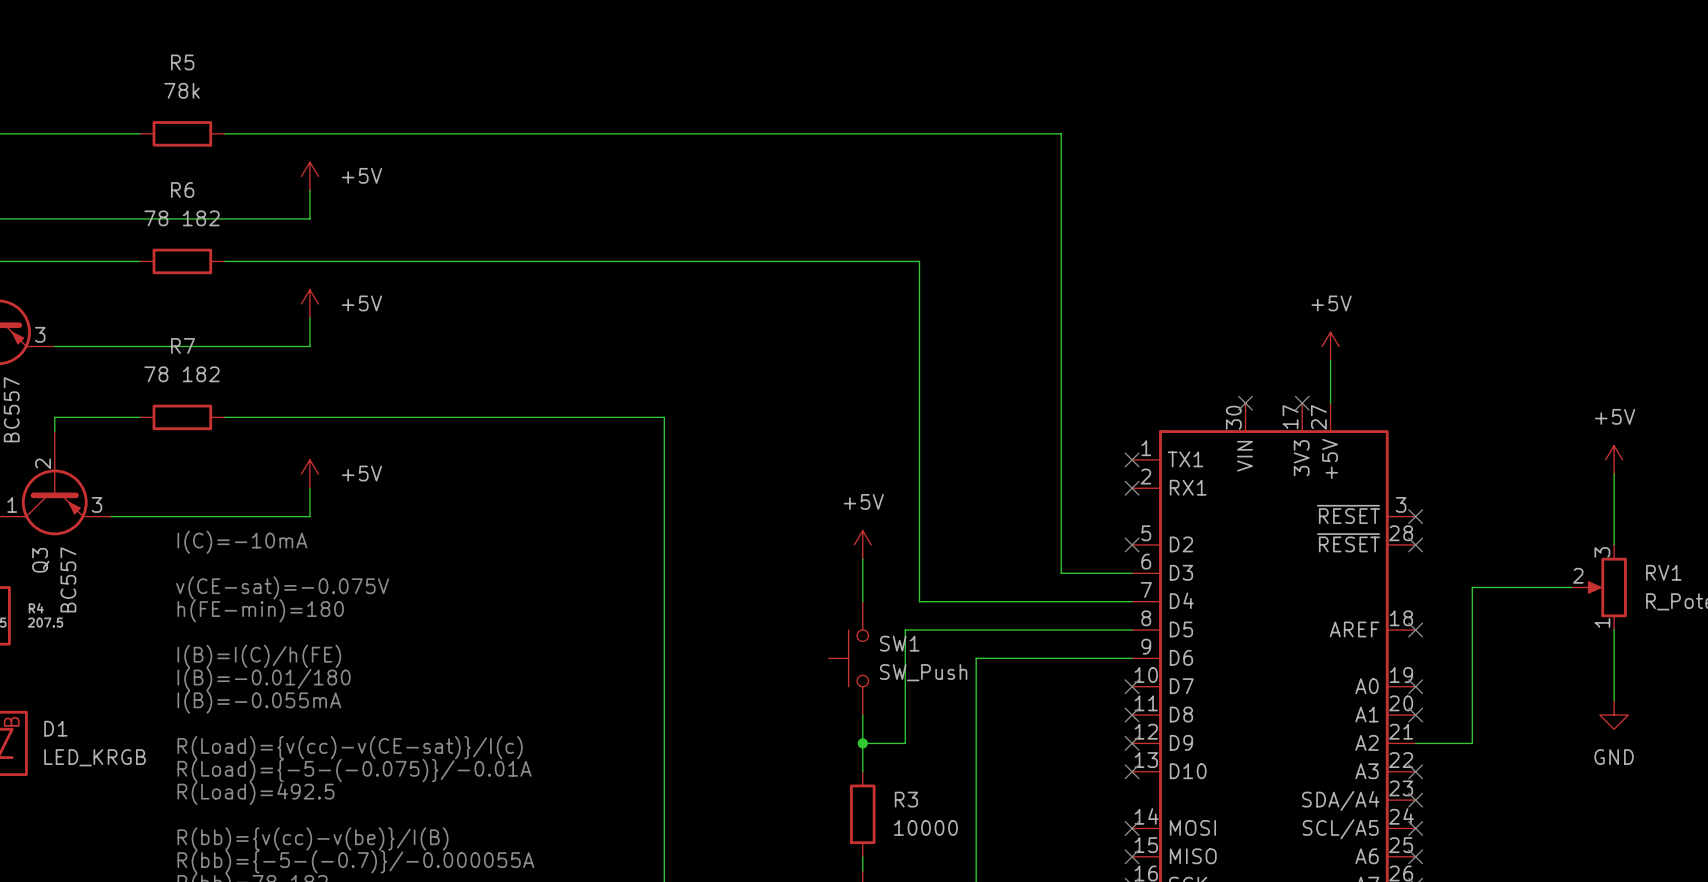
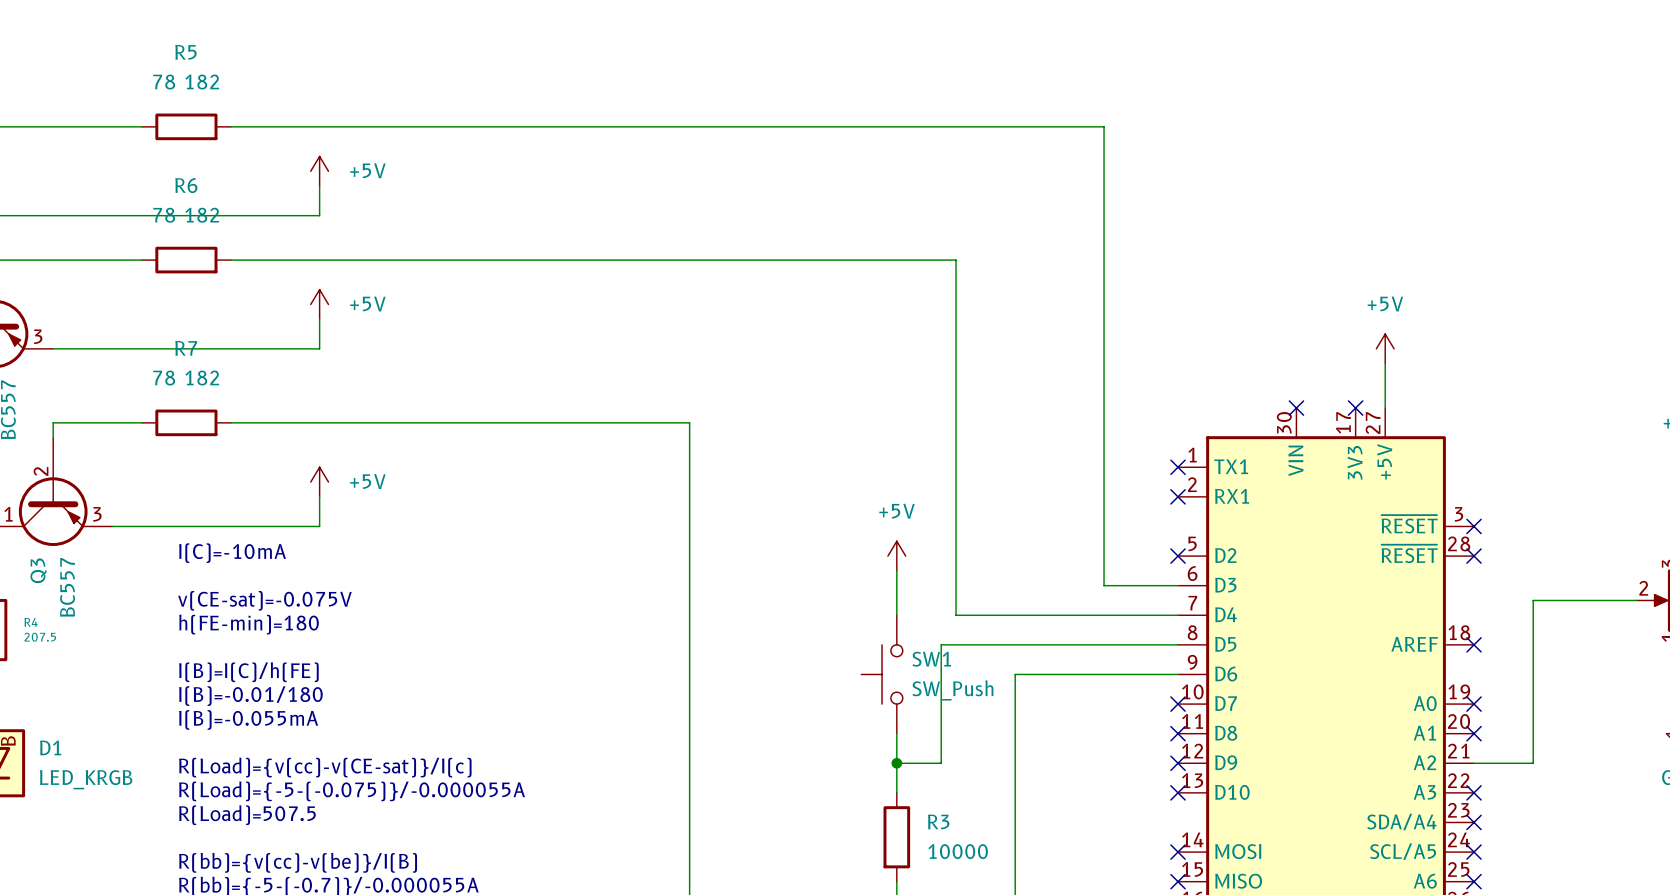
R5 value: 78k (182, 90) -> 78 182 (186, 81)
text: R(Load)={-5-(-0.075)}/-0.01A (354, 770) -> R(Load)={-5-(-0.075)}/-0.000055A (352, 791)
text: R(Load)=492.5 (255, 793) -> R(Load)=507.5 (247, 815)

